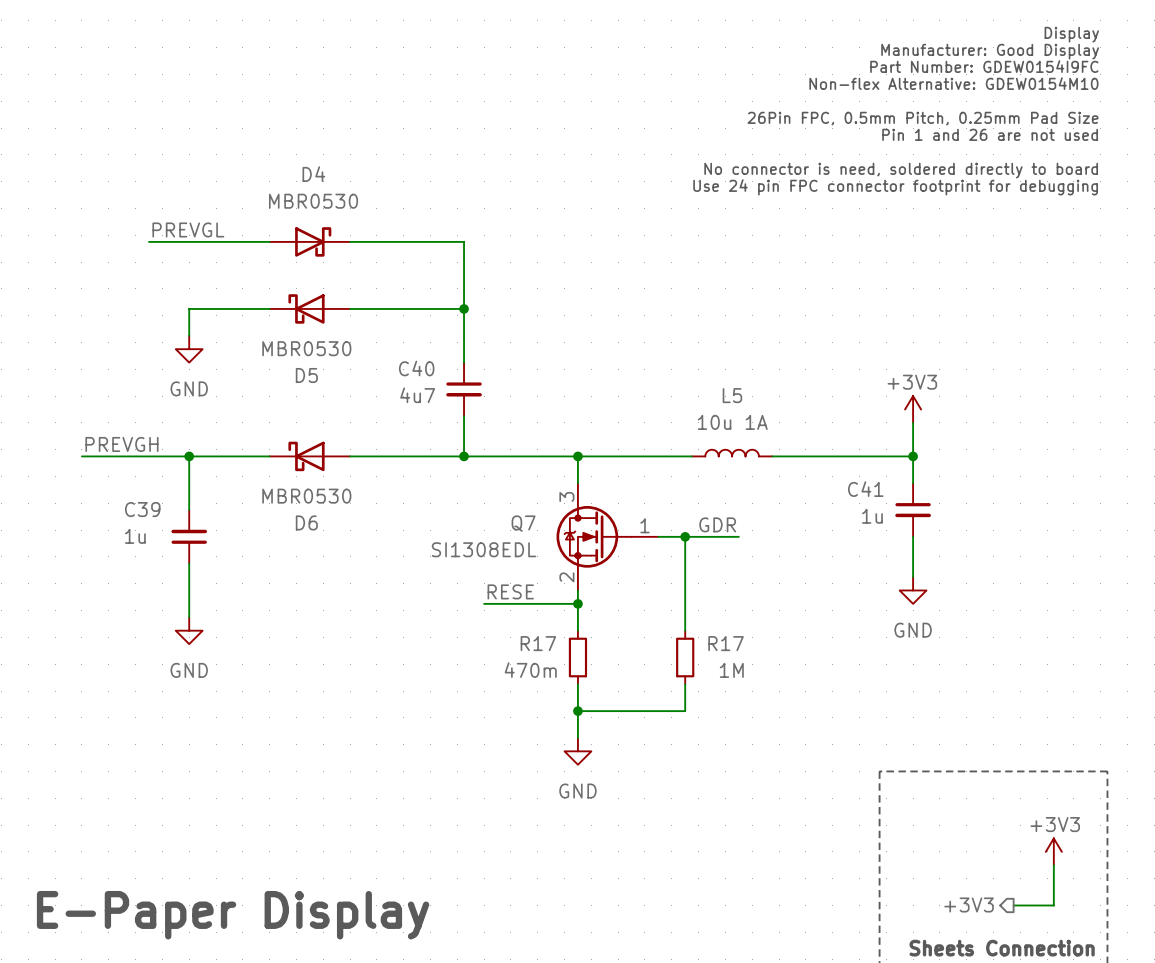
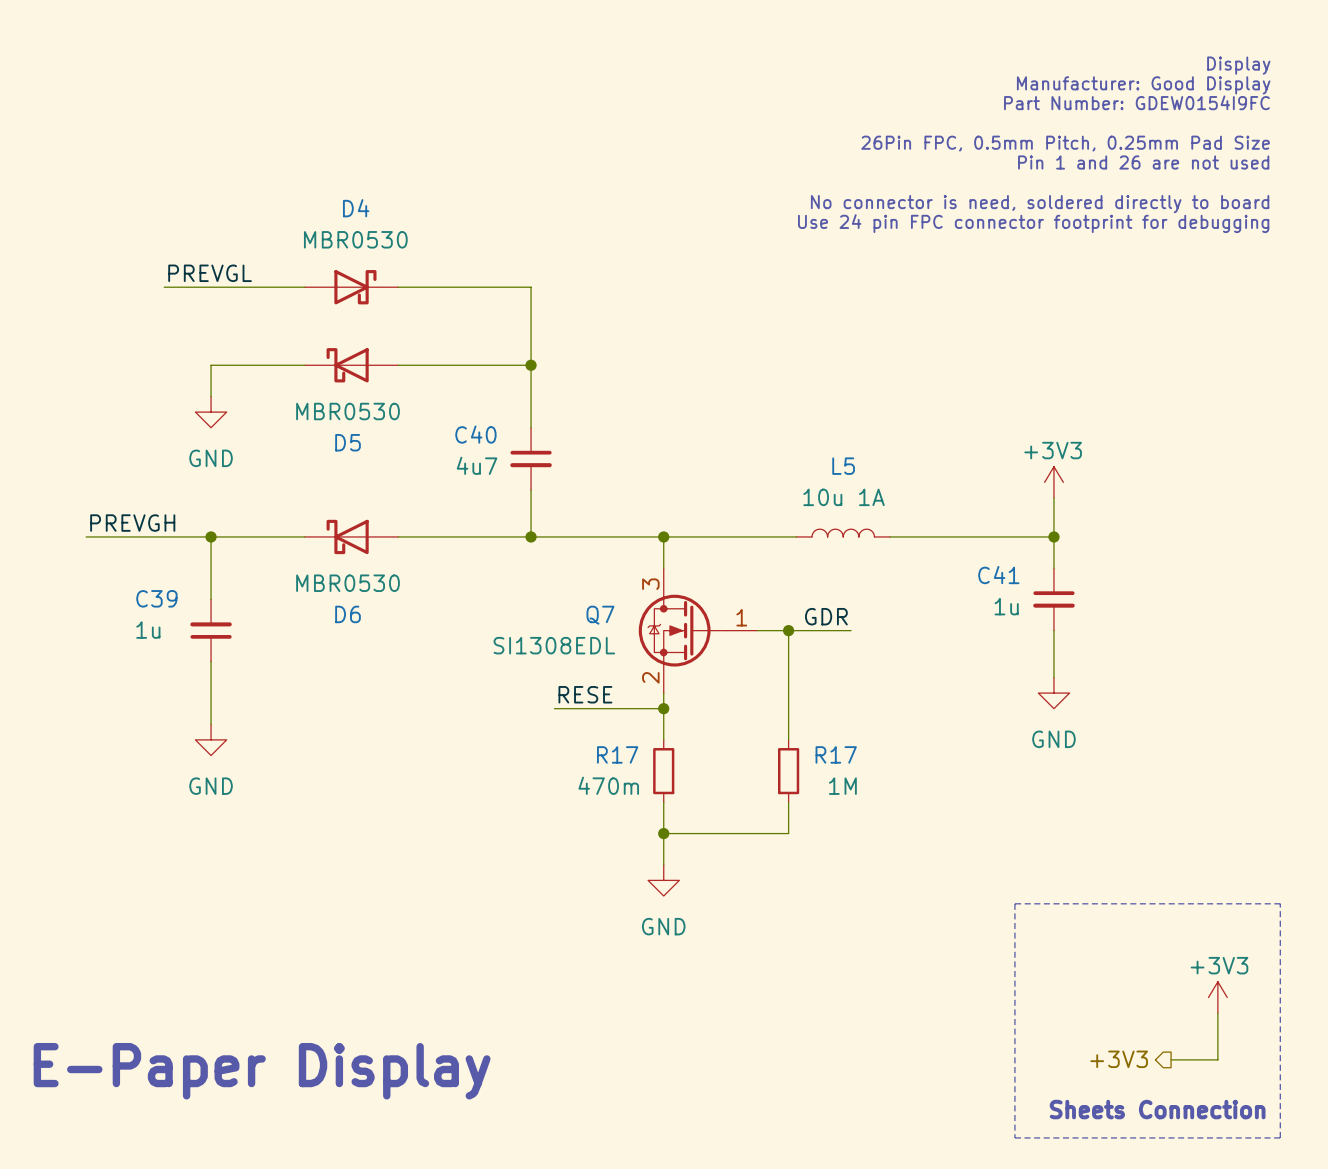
text: Display (1071, 34) -> none
text: Manufacturer: Good Display (990, 51) -> Display (1238, 65)
text: Part Number: GDEW0154I9FC (984, 66) -> Manufacturer: Good Display (1143, 85)
text: Non-flex Alternative: GDEW0154M10 (953, 83) -> Part Number: GDEW0154I9FC (1136, 102)

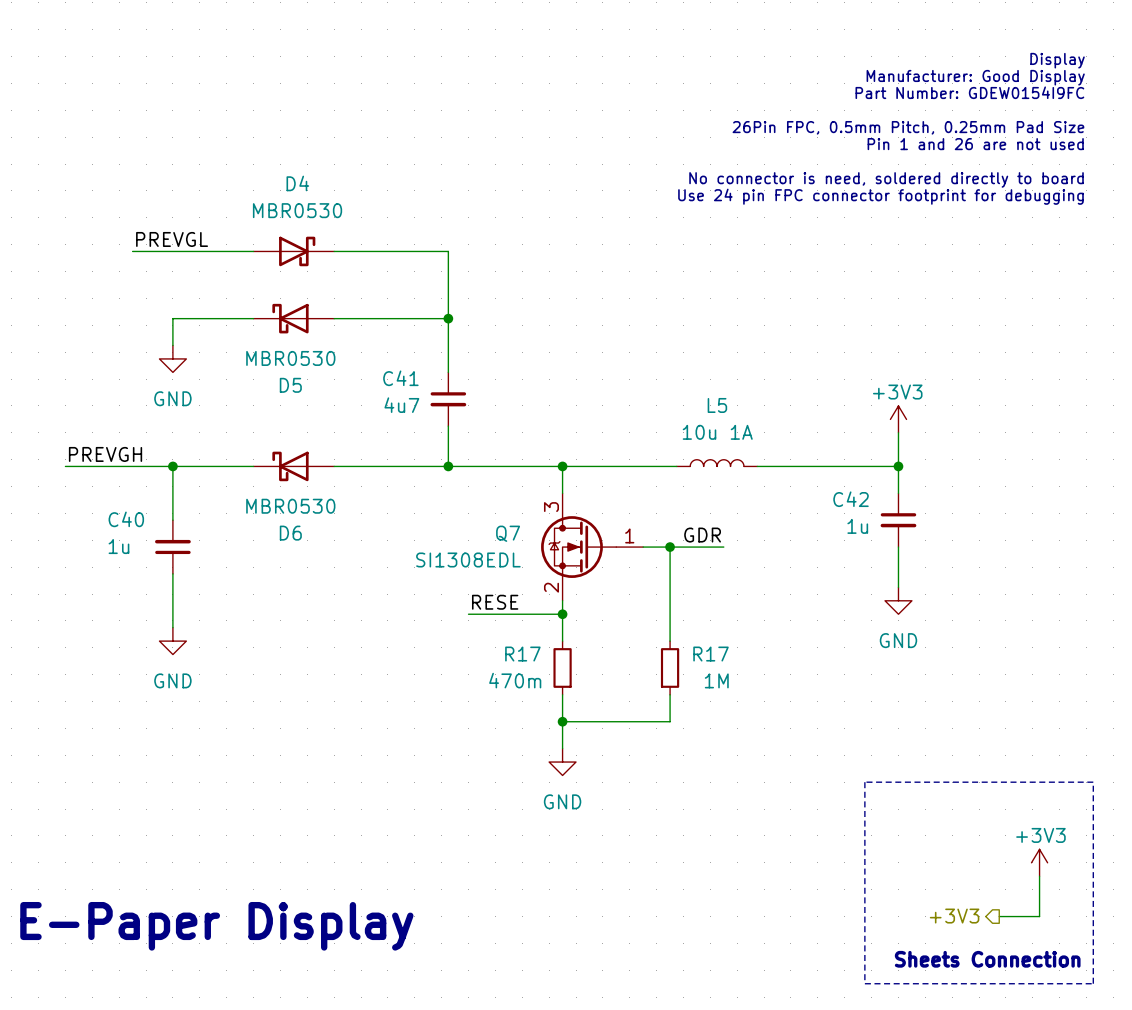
C40 name: C40 (475, 434) -> C41 (400, 378)
C41 name: C41 (998, 575) -> C42 (851, 499)
C39 name: C39 (156, 598) -> C40 (126, 519)

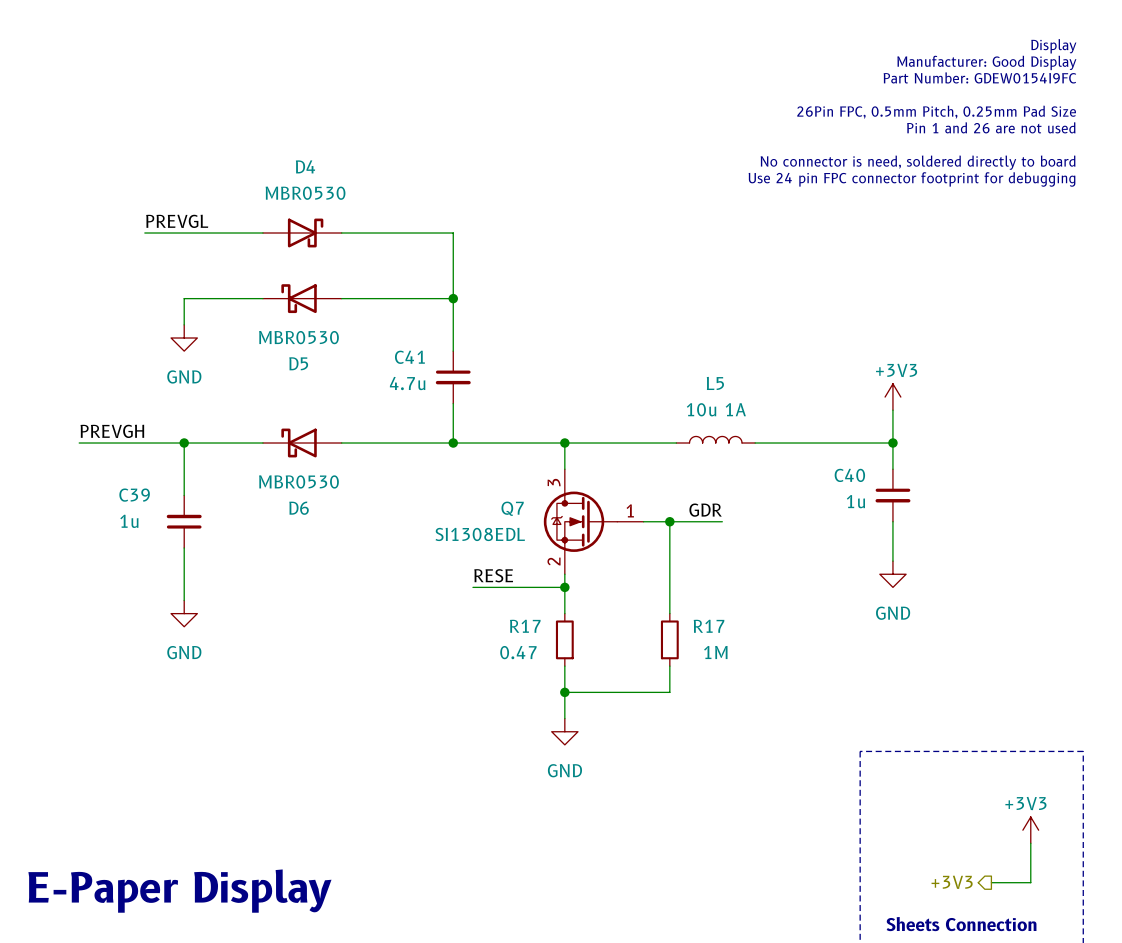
C41 value: 4u7 (401, 405) -> 4.7u (407, 383)
C42 name: C42 (851, 499) -> C40 (849, 475)
C40 name: C40 (126, 519) -> C39 (134, 495)
R17 value: 470m (515, 680) -> 0.47 (518, 652)

